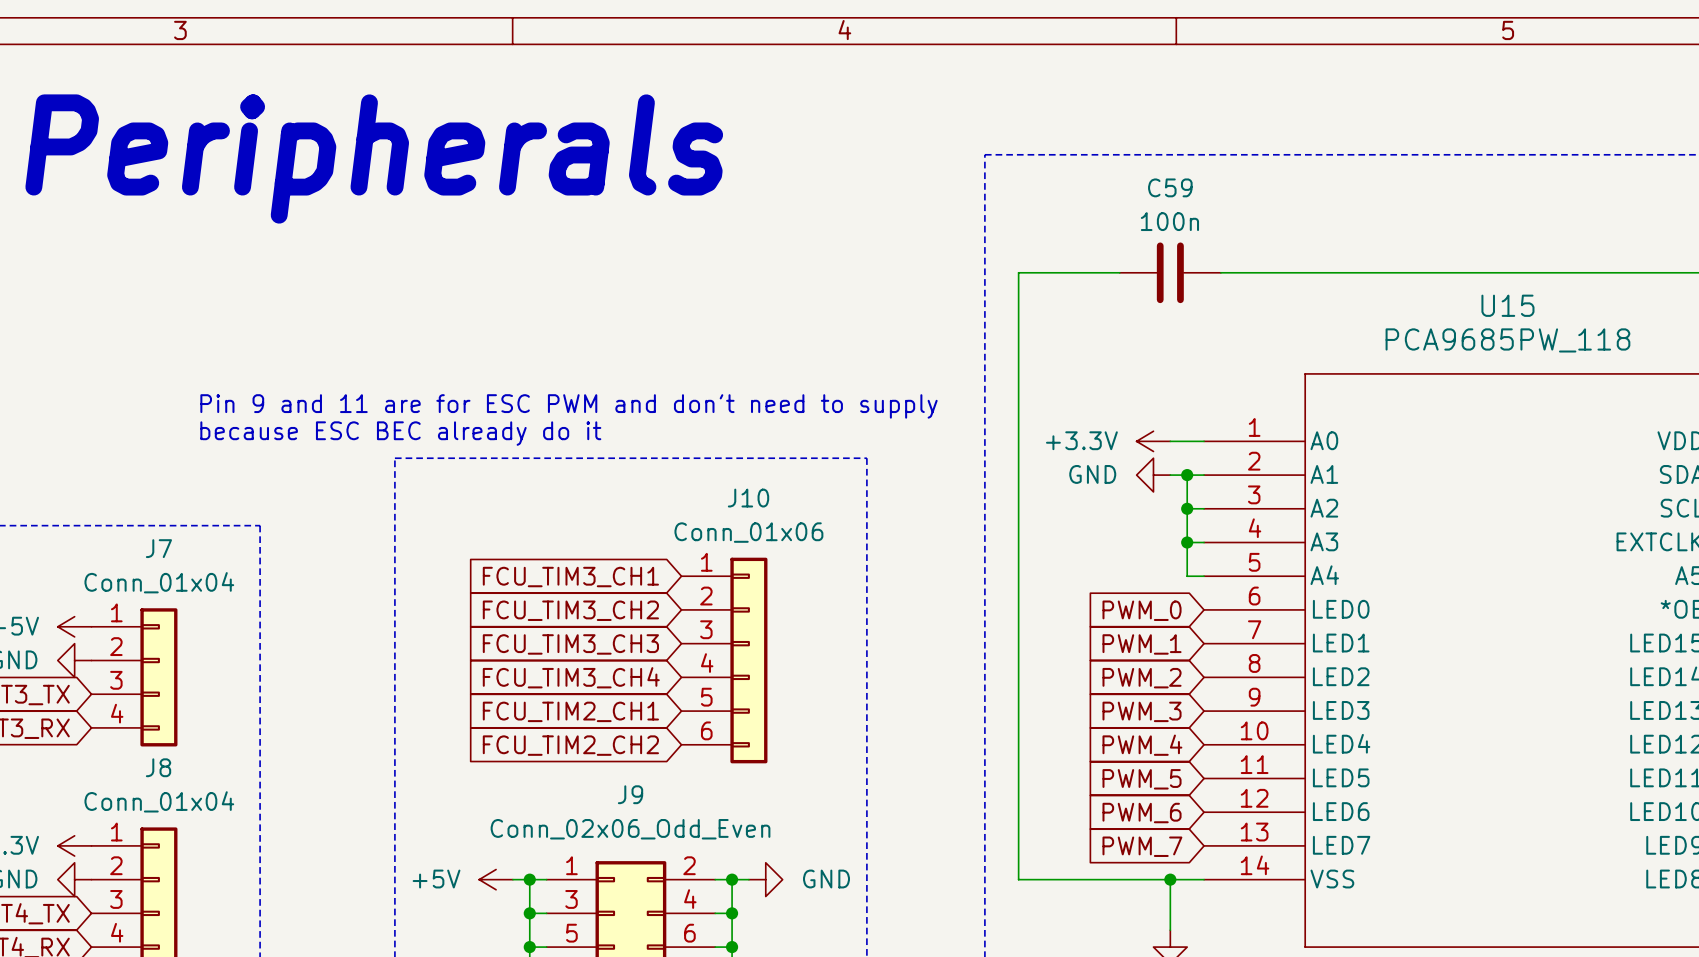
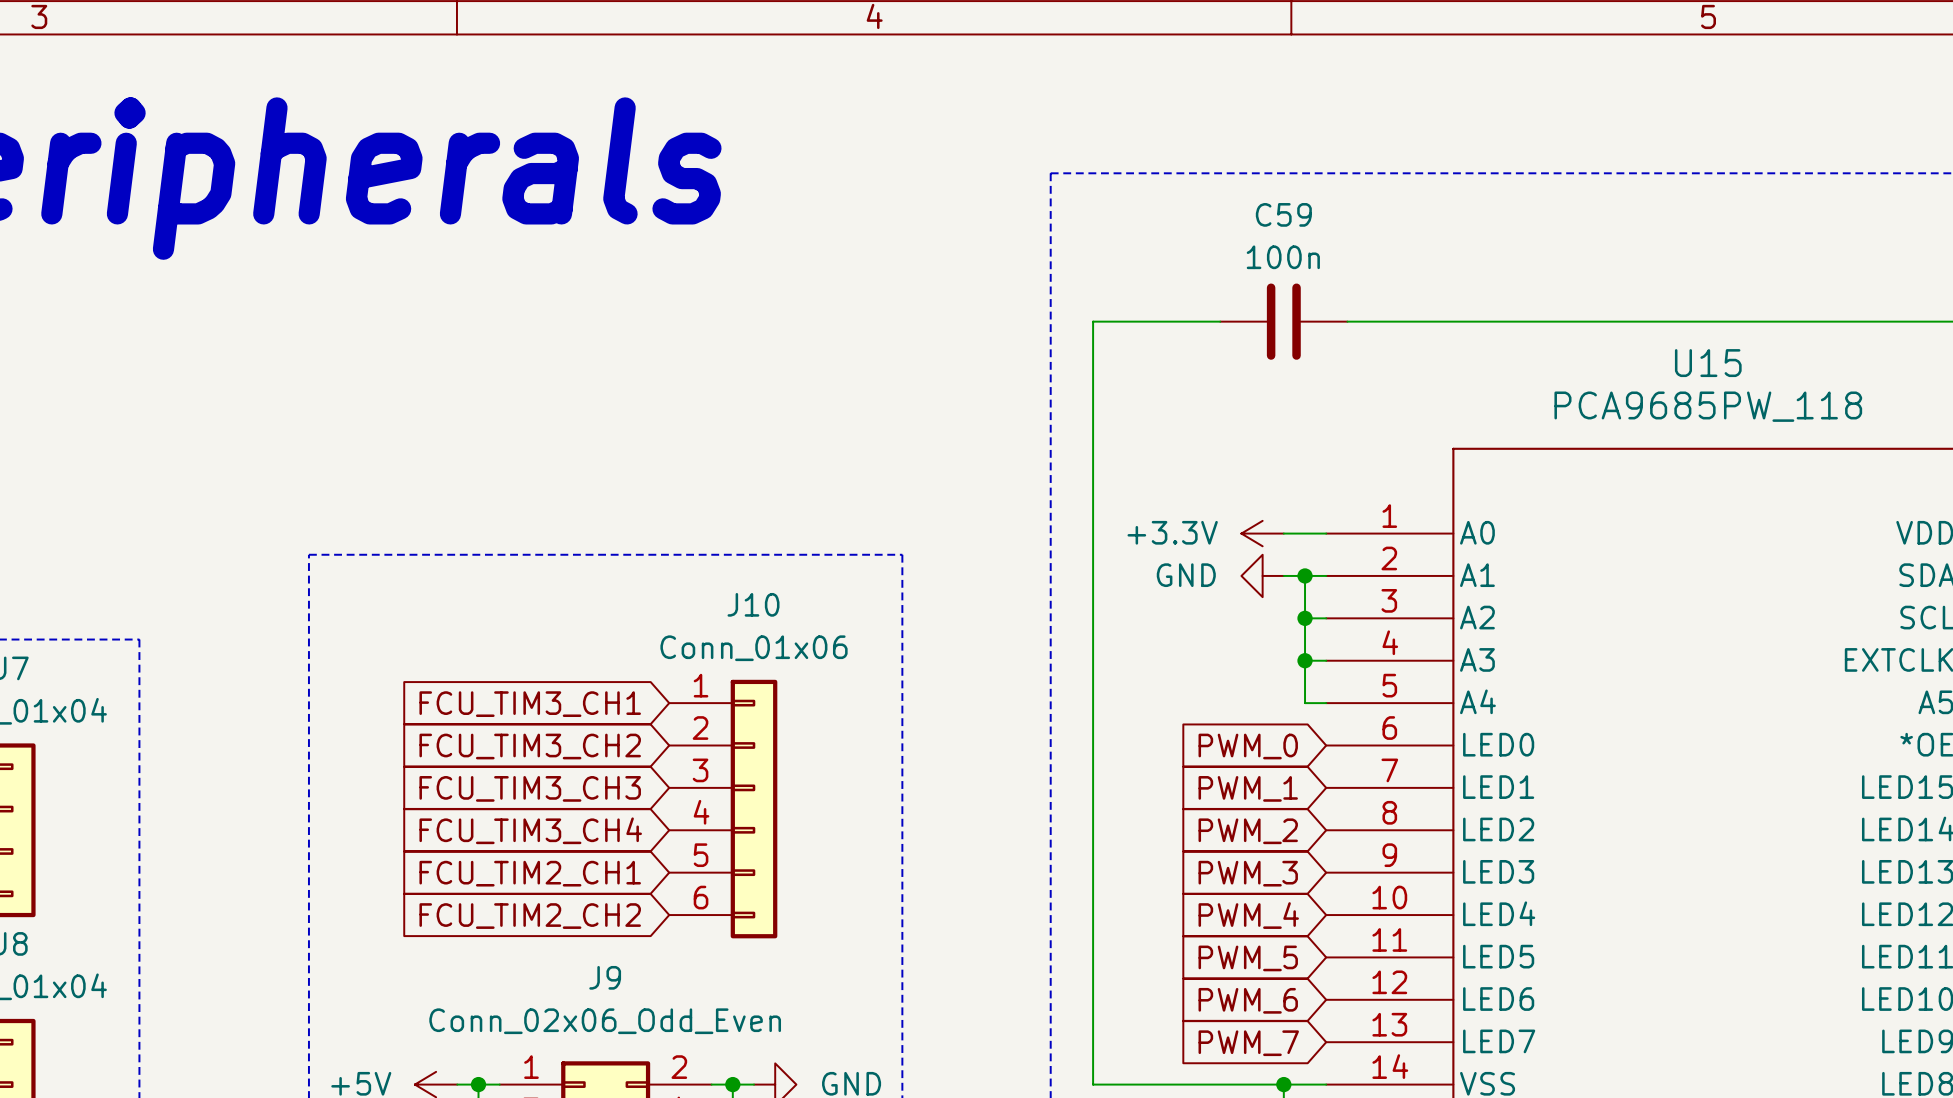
text: Pin 9 and 11 are for ESC PWM and don't need to supply (568, 406) -> none
text: because ESC BEC already do it (400, 433) -> none

